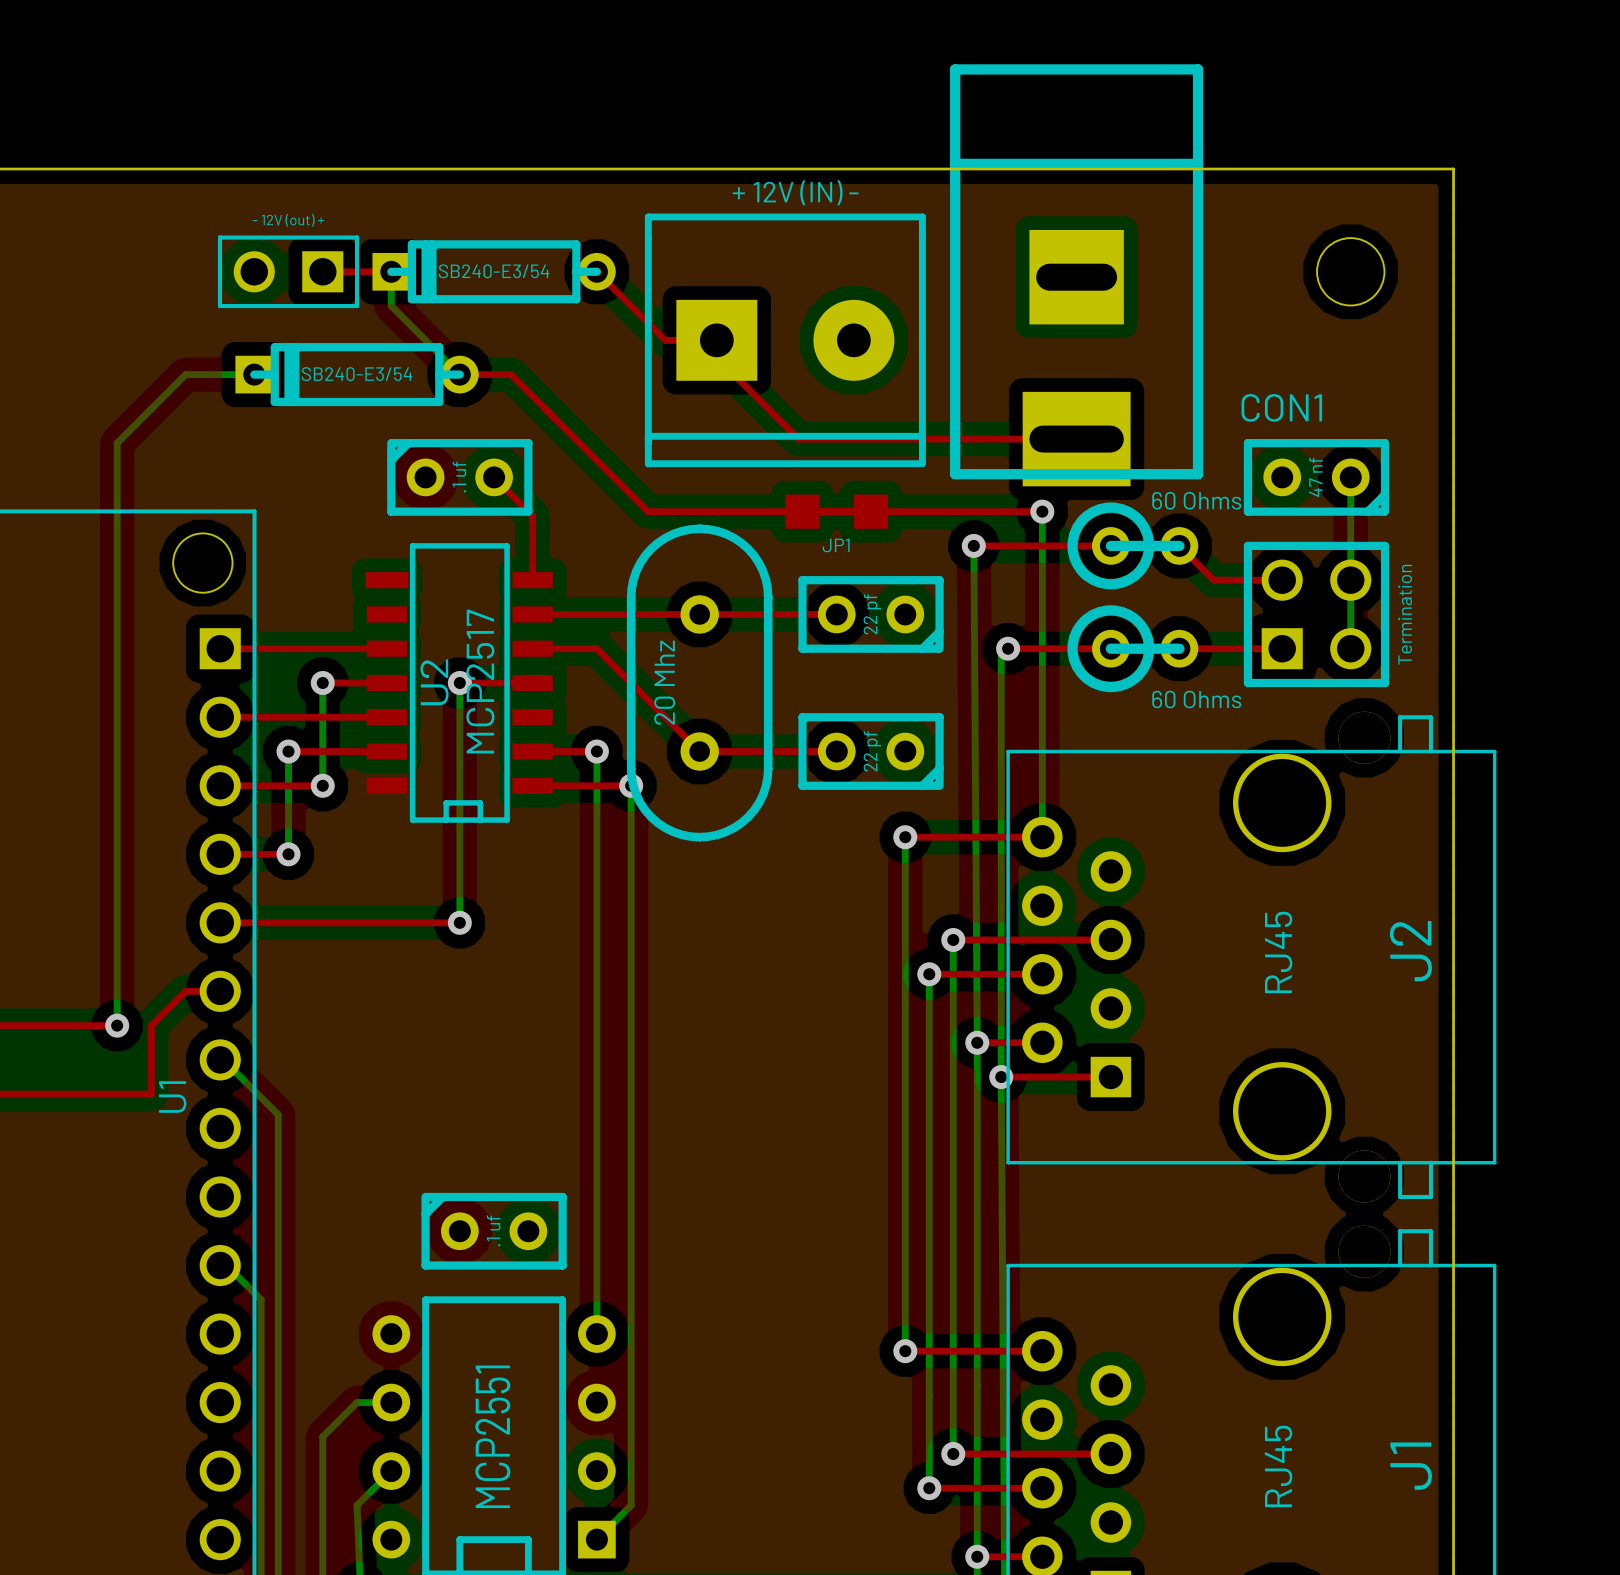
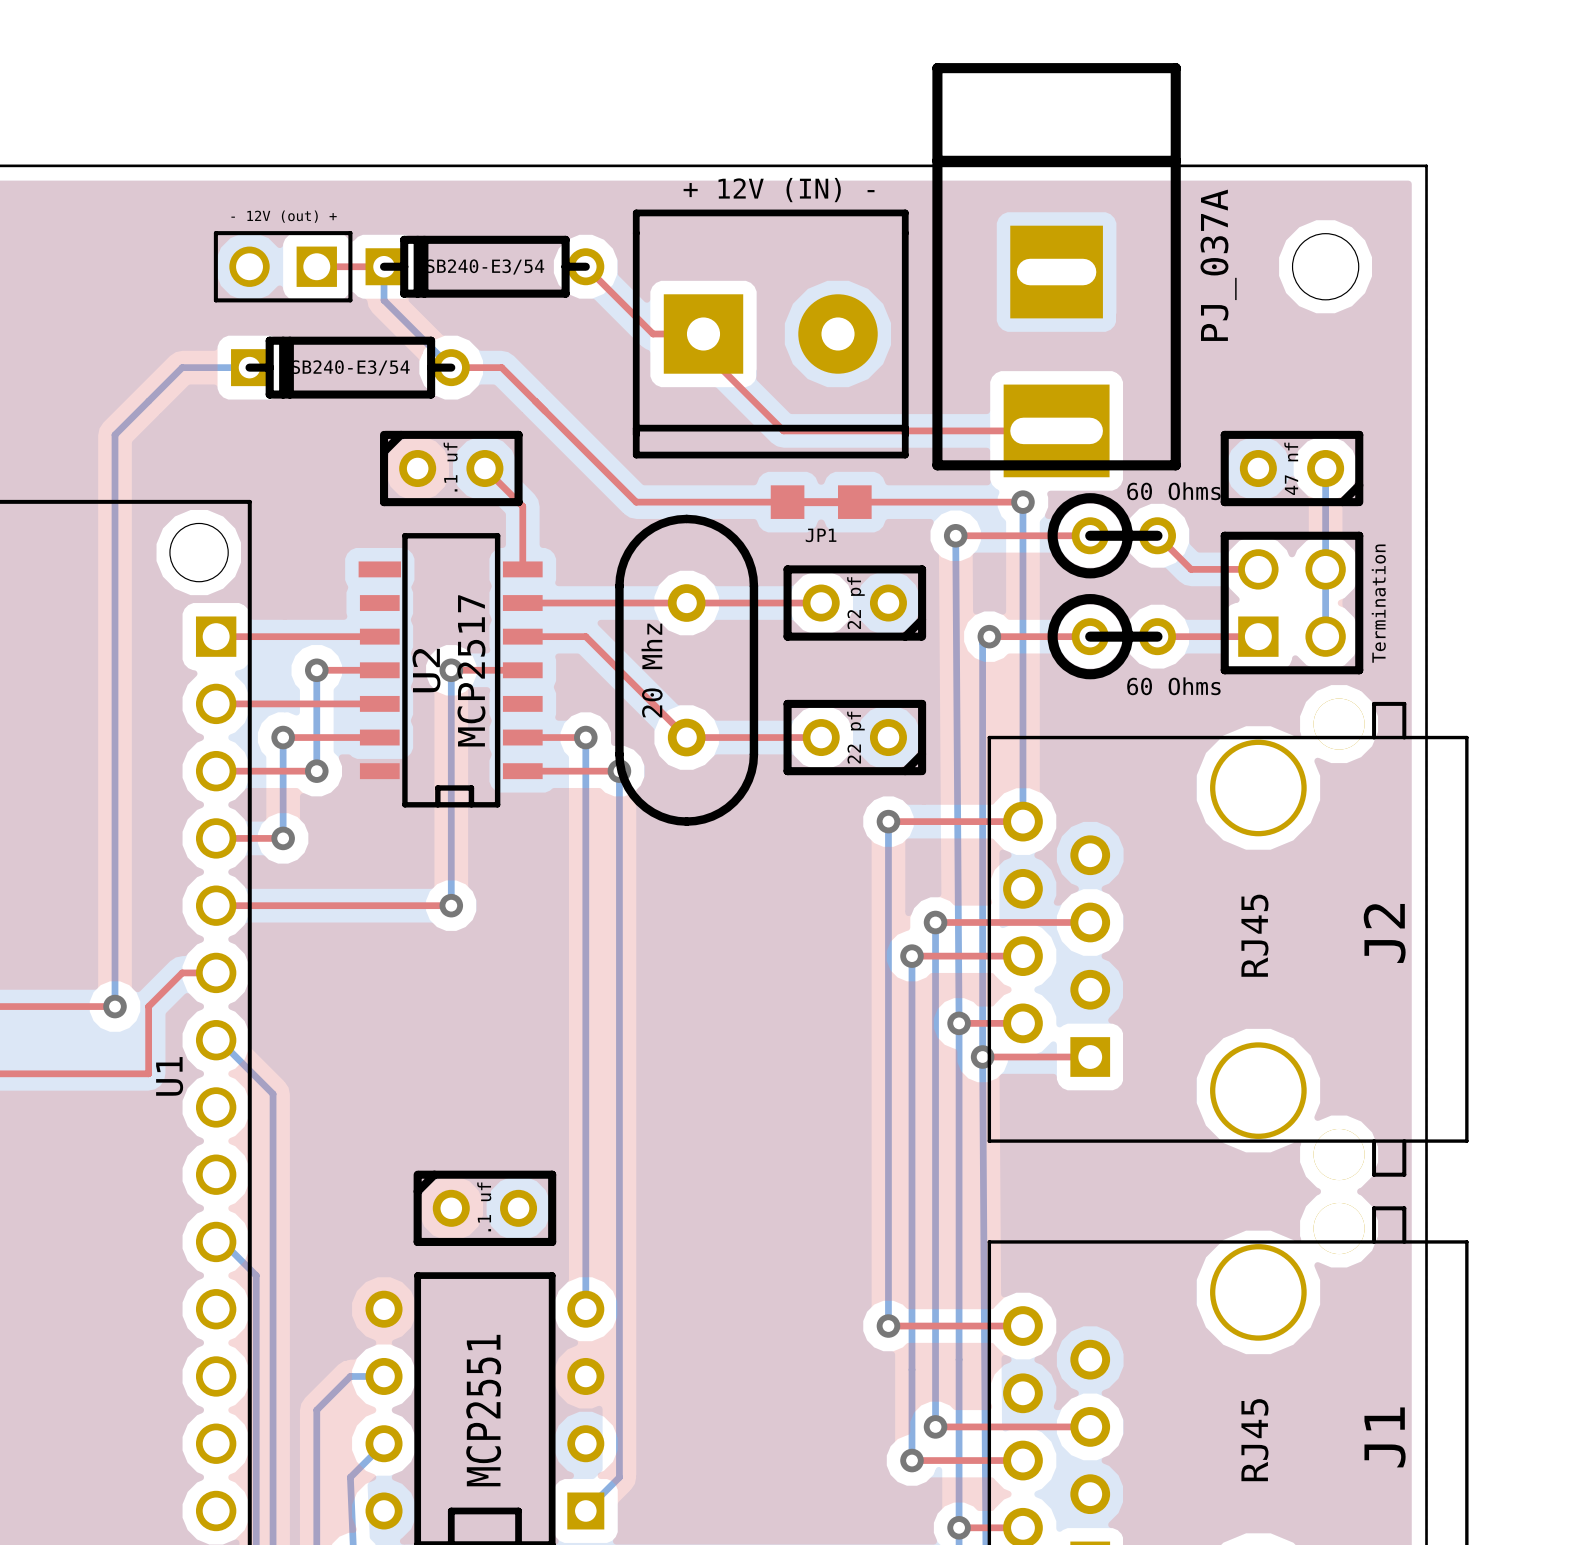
CON1 value: none -> PJ_037A (1218, 265)
CON1 name: CON1 (1281, 407) -> none

